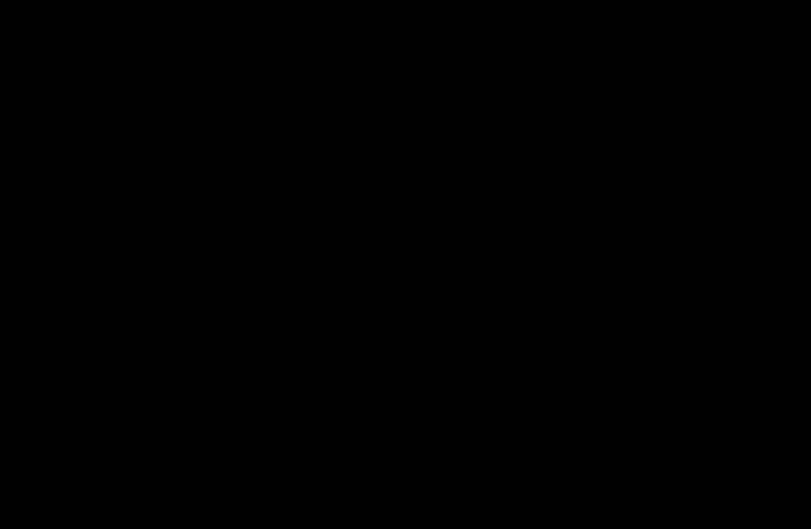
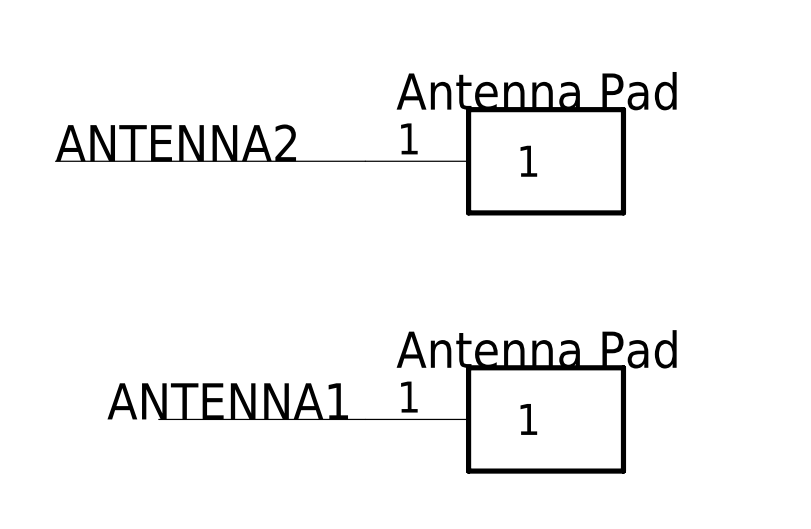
label: none -> ANTENNA2 (175, 142)
wire: none -> (55, 161) (365, 161)
part: none -> (495, 161)
label: none -> ANTENNA1 (227, 401)
wire: none -> (158, 419) (365, 419)
part: none -> (495, 419)

